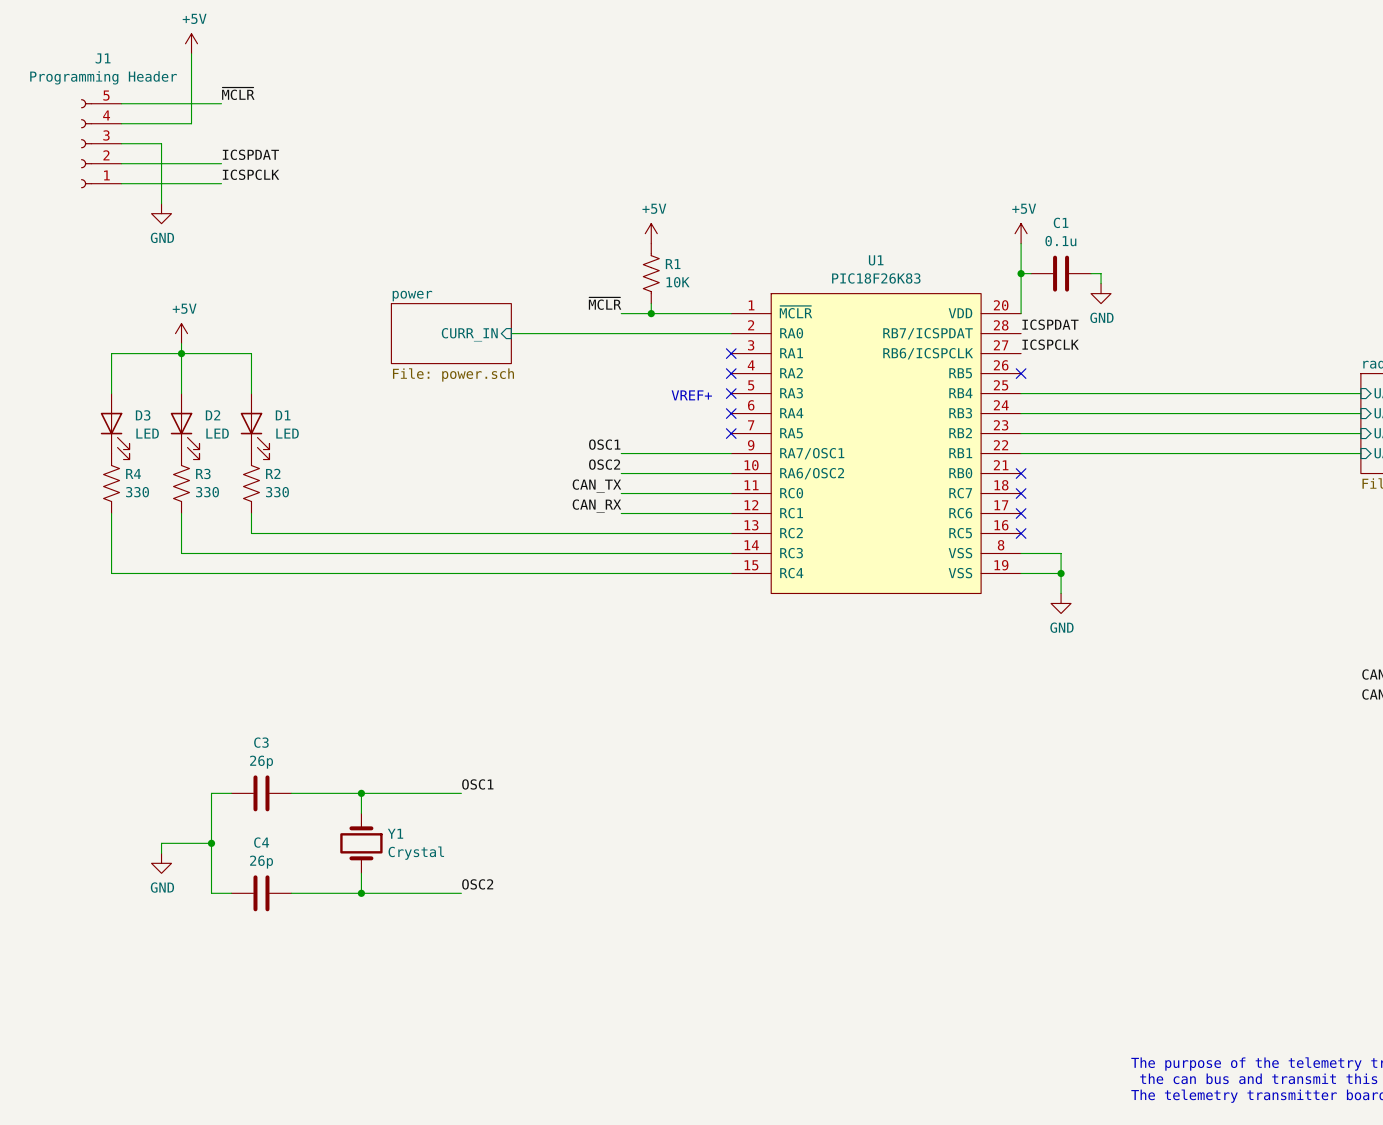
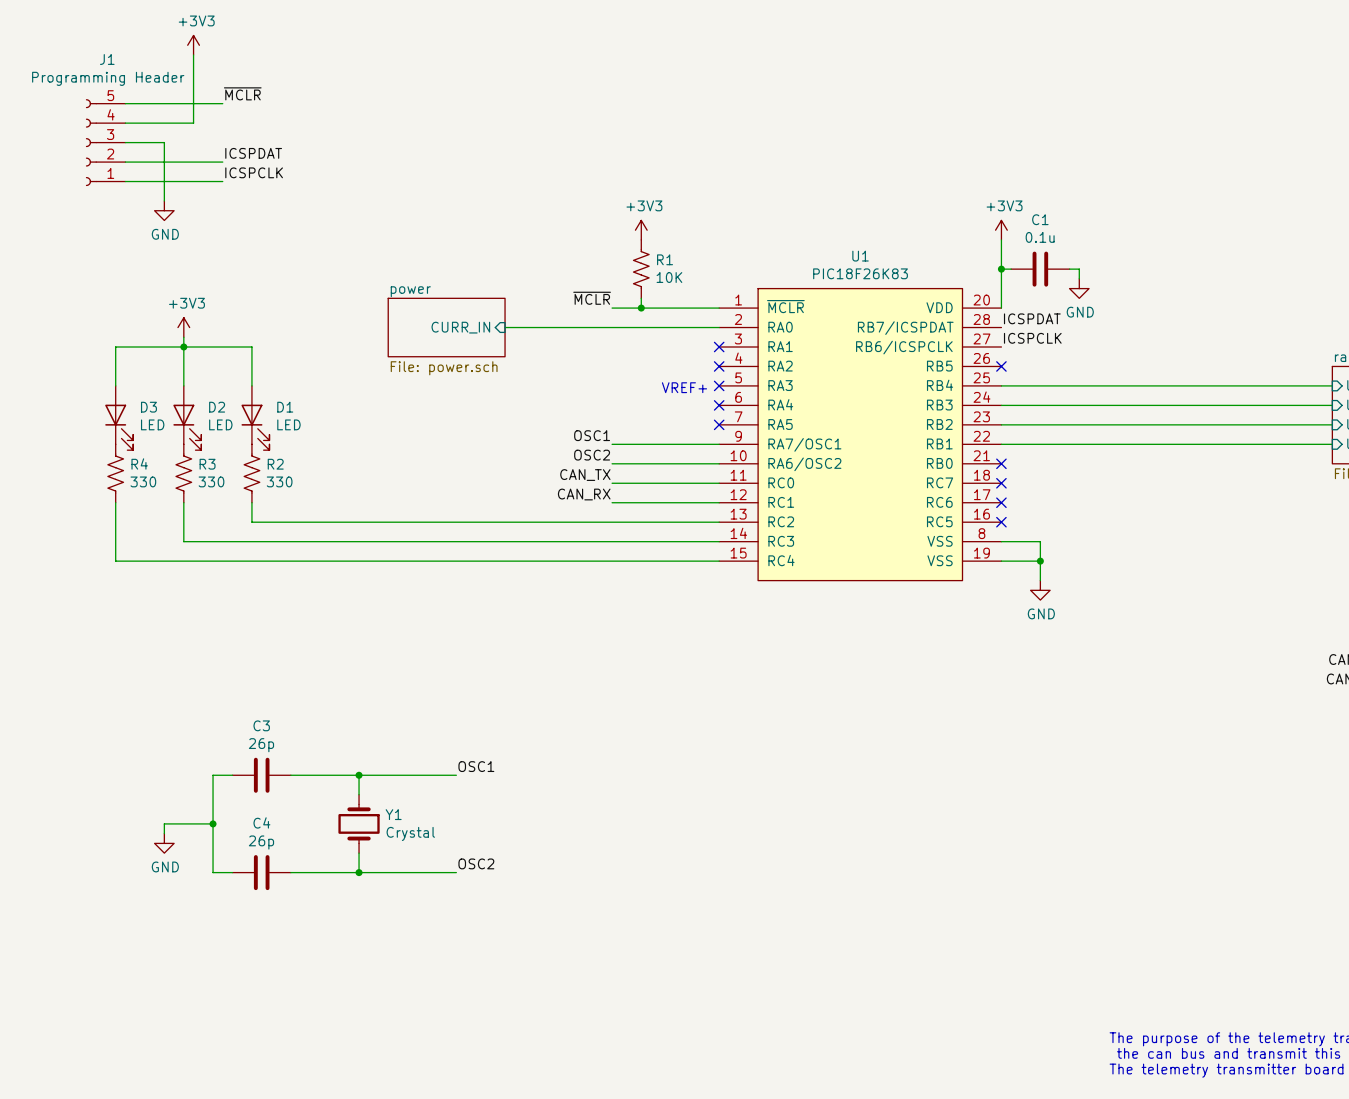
power symbol: +5V (191, 43) -> +3V3 (193, 45)
power symbol: +5V (651, 233) -> +3V3 (641, 230)
power symbol: +5V (1021, 233) -> +3V3 (1001, 230)
power symbol: +5V (181, 333) -> +3V3 (183, 327)

